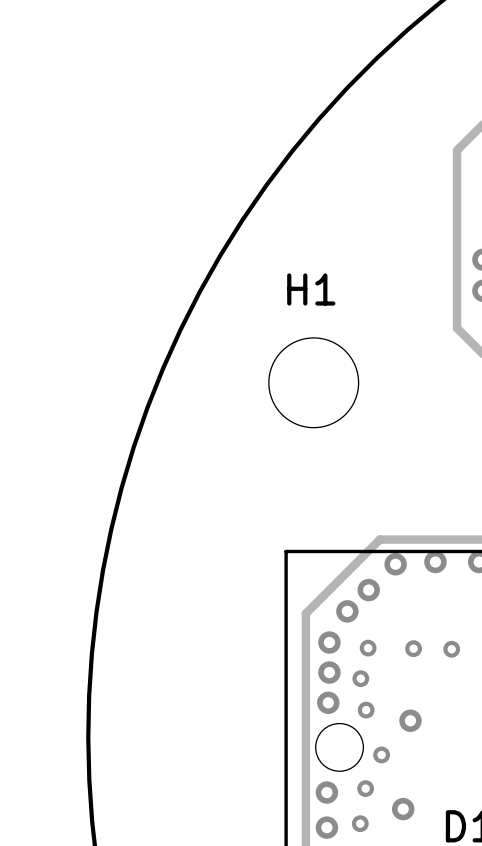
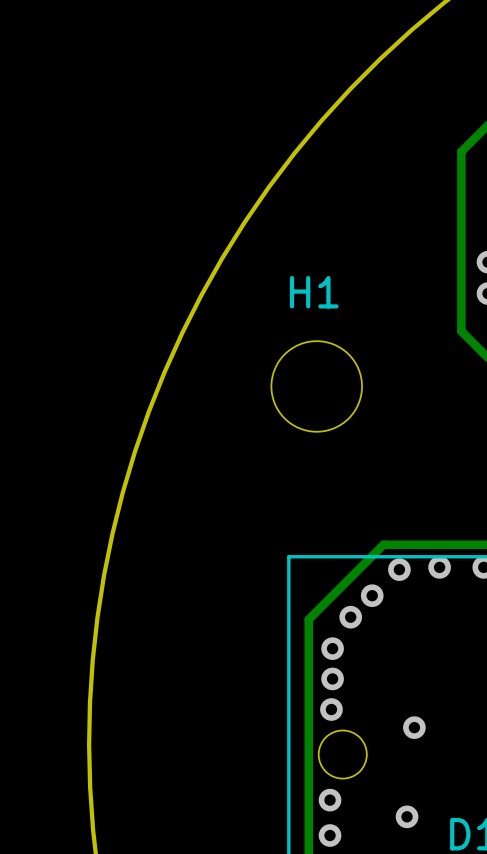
via: (368, 648) -> none
via: (413, 648) -> none
via: (451, 649) -> none
via: (360, 678) -> none
via: (366, 710) -> none
via: (381, 754) -> none
via: (365, 788) -> none
via: (360, 823) -> none

